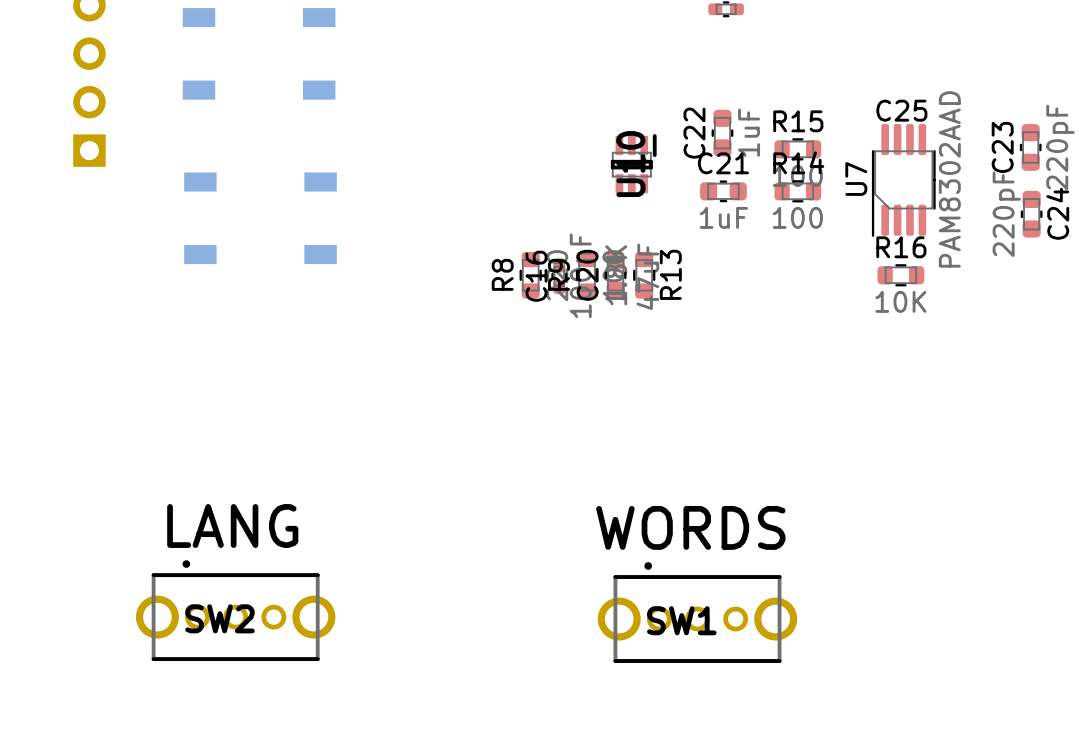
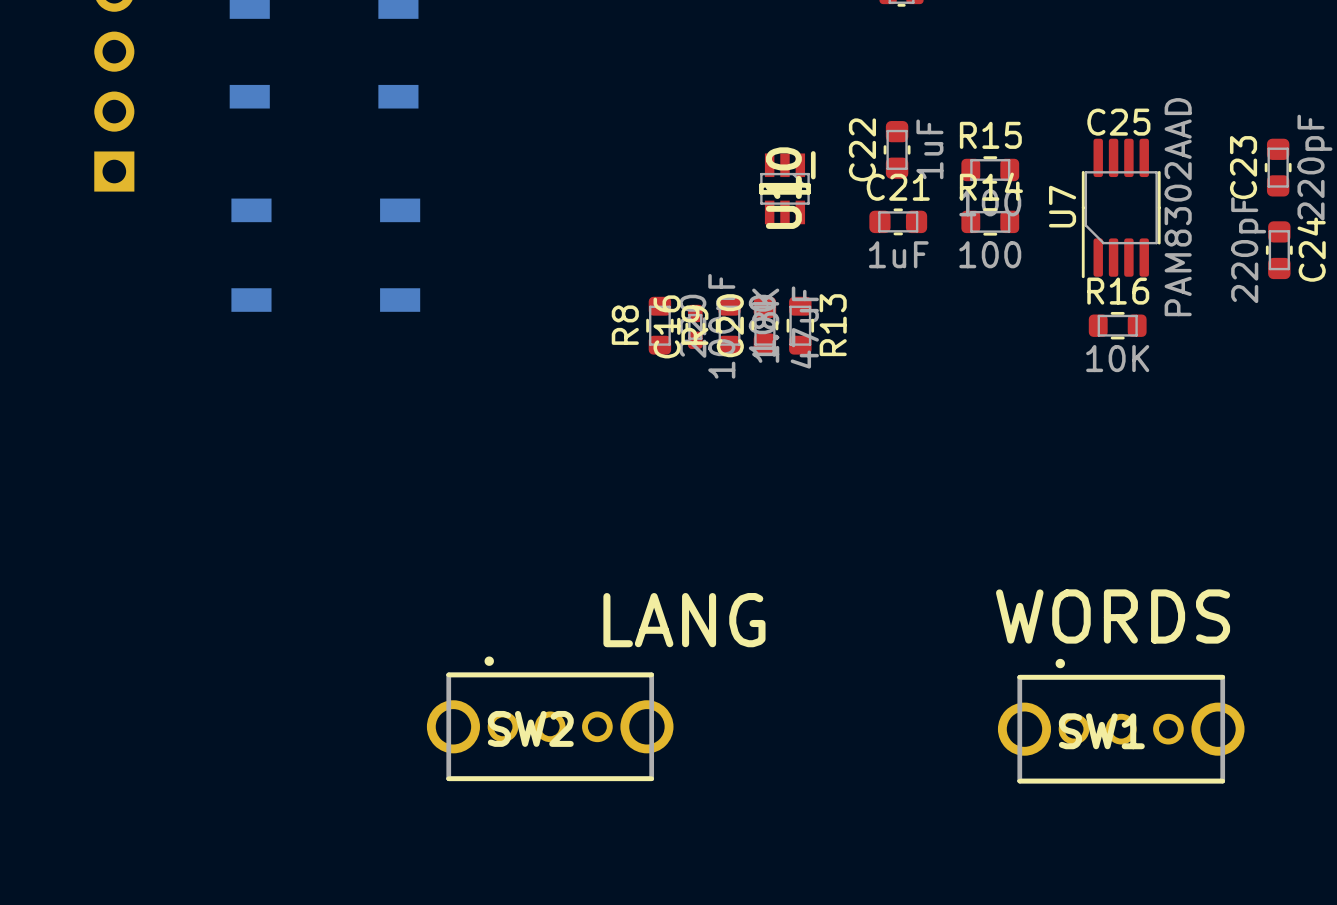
text position: LANG (232, 526) -> LANG (684, 620)
text position: WORDS (690, 527) -> WORDS (1113, 616)
SW2 position: (235, 610) -> (550, 718)
SW1 position: (697, 612) -> (1121, 721)

